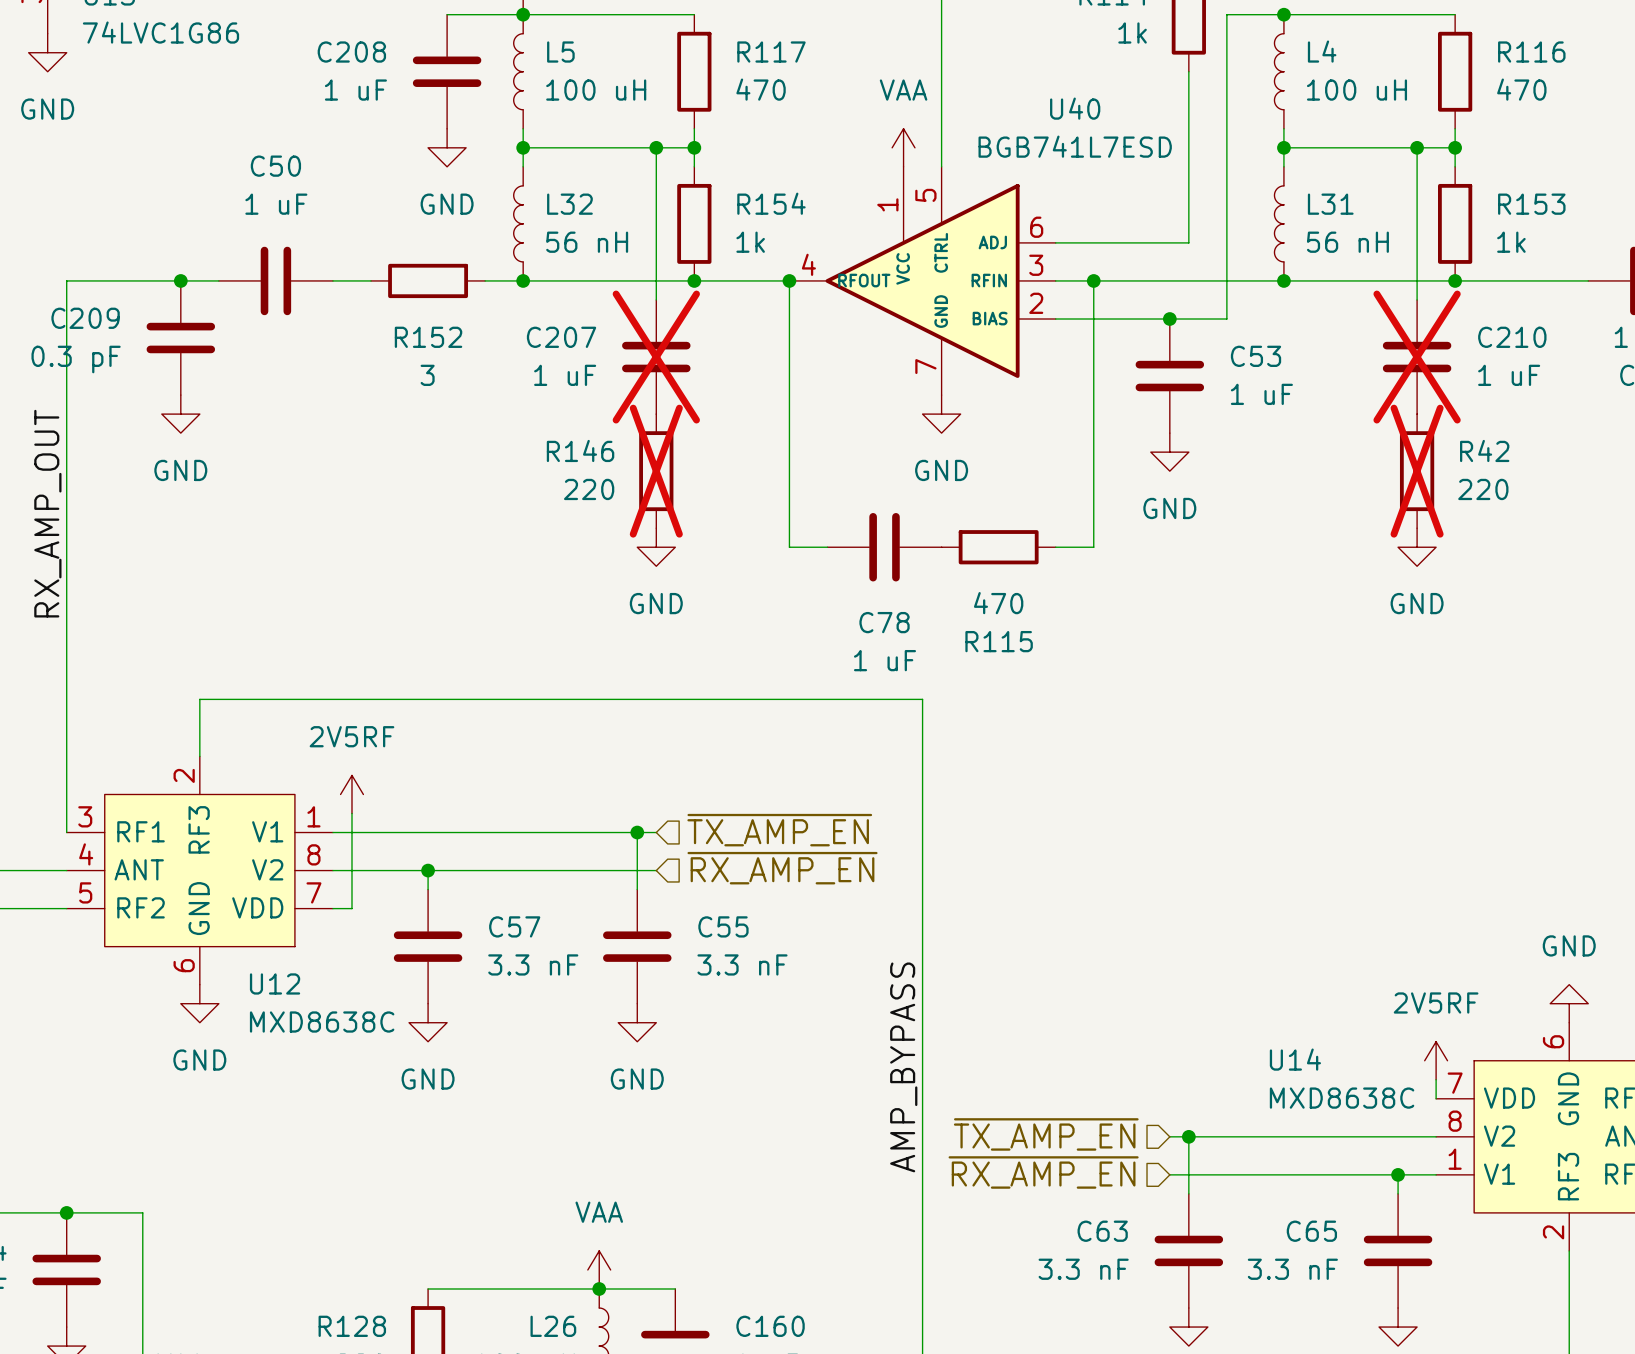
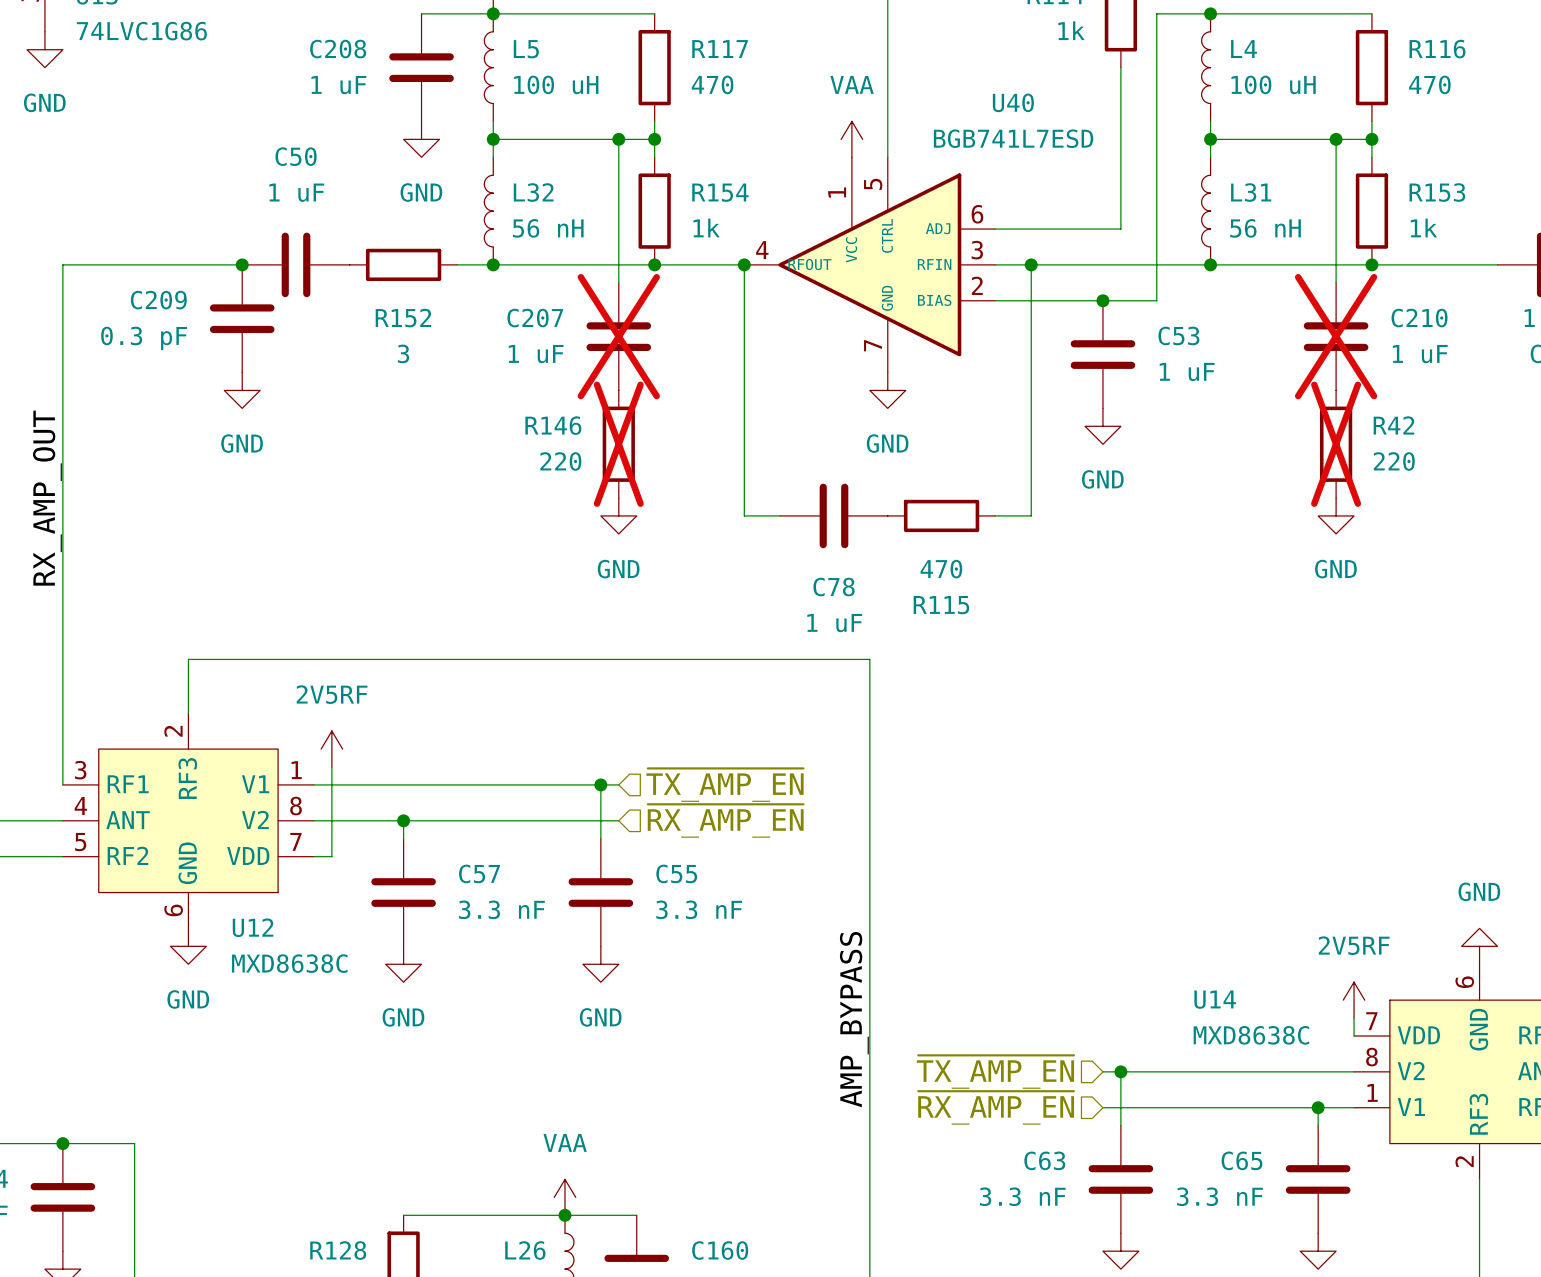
junction position: (180, 280) -> (242, 264)
C50 position: (275, 280) -> (296, 264)
C209 position: (180, 338) -> (242, 318)
power symbol position: GND (180, 414) -> GND (242, 390)

